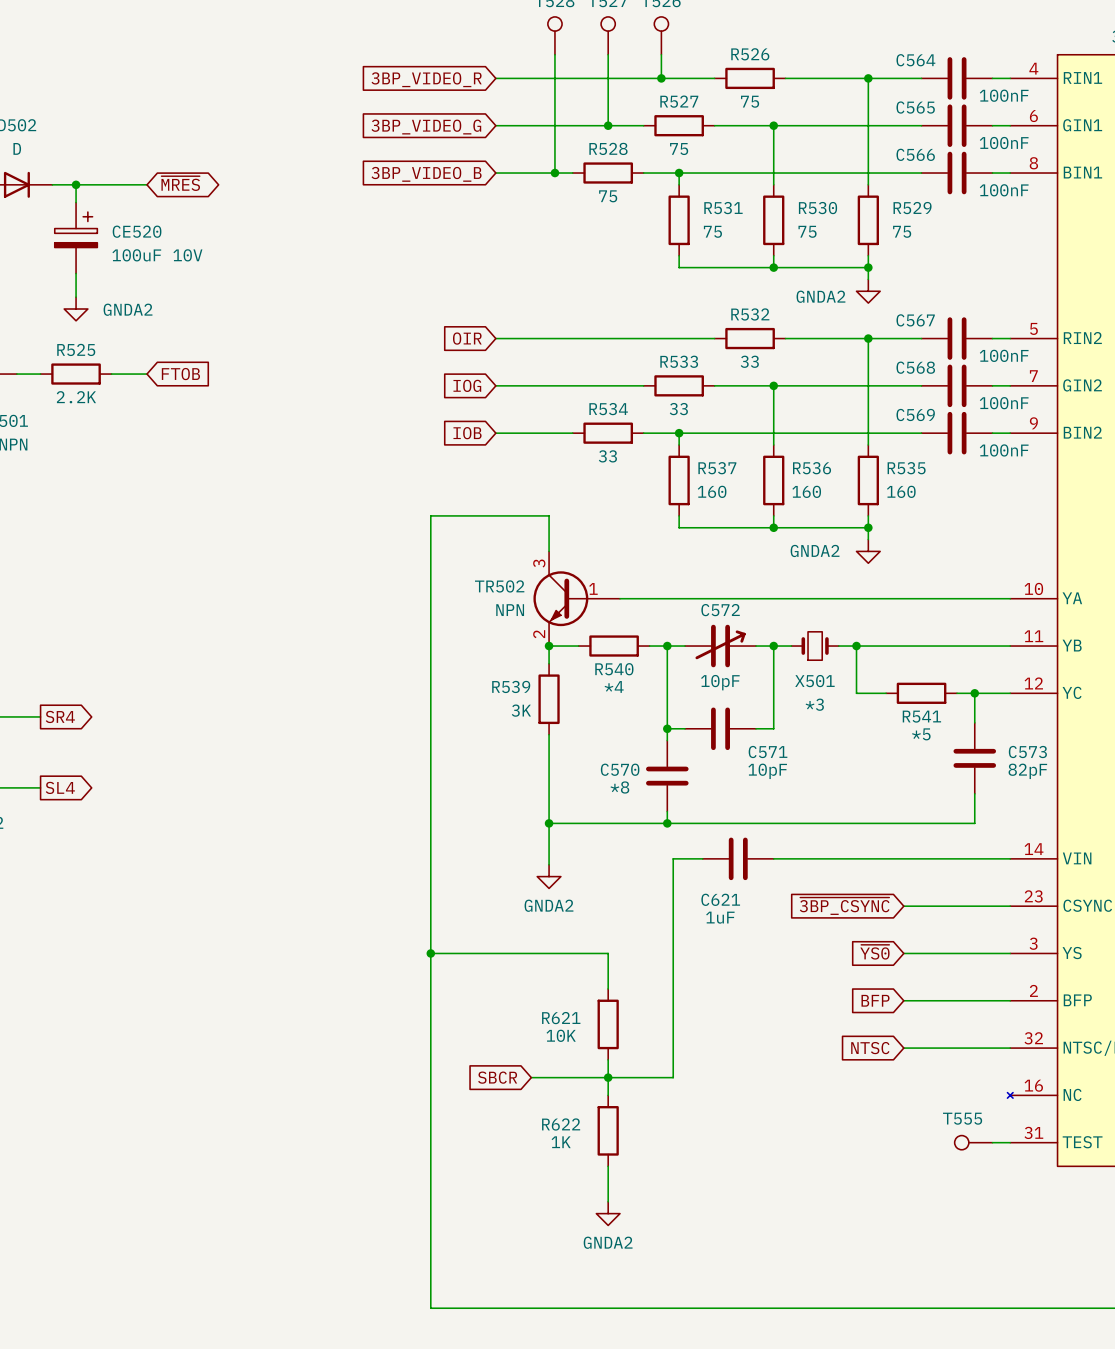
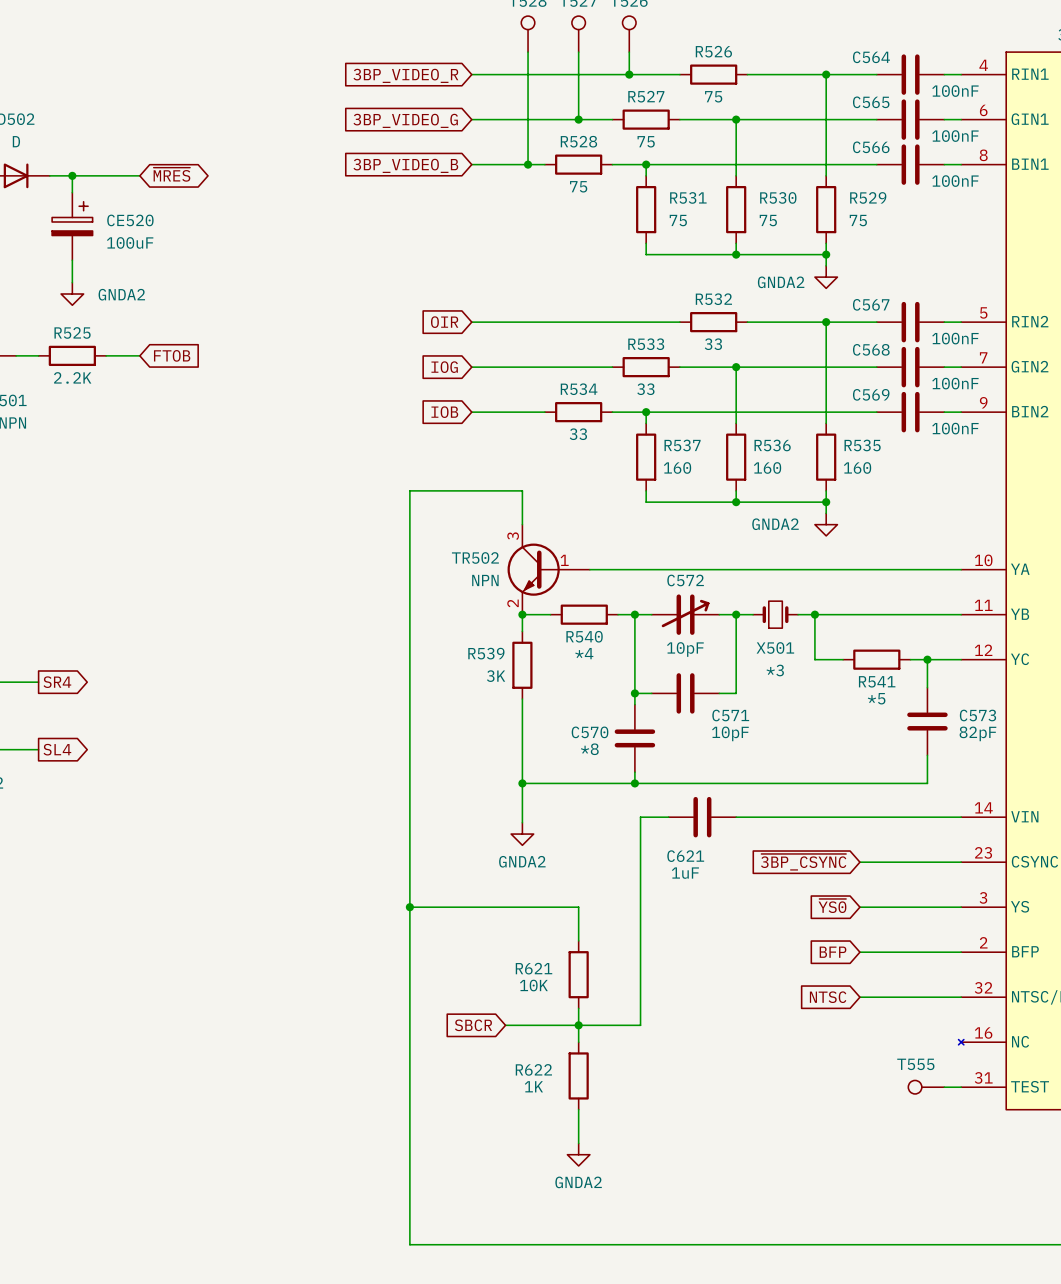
CE520 value: 100uF 10V (157, 255) -> 100uF (130, 242)

